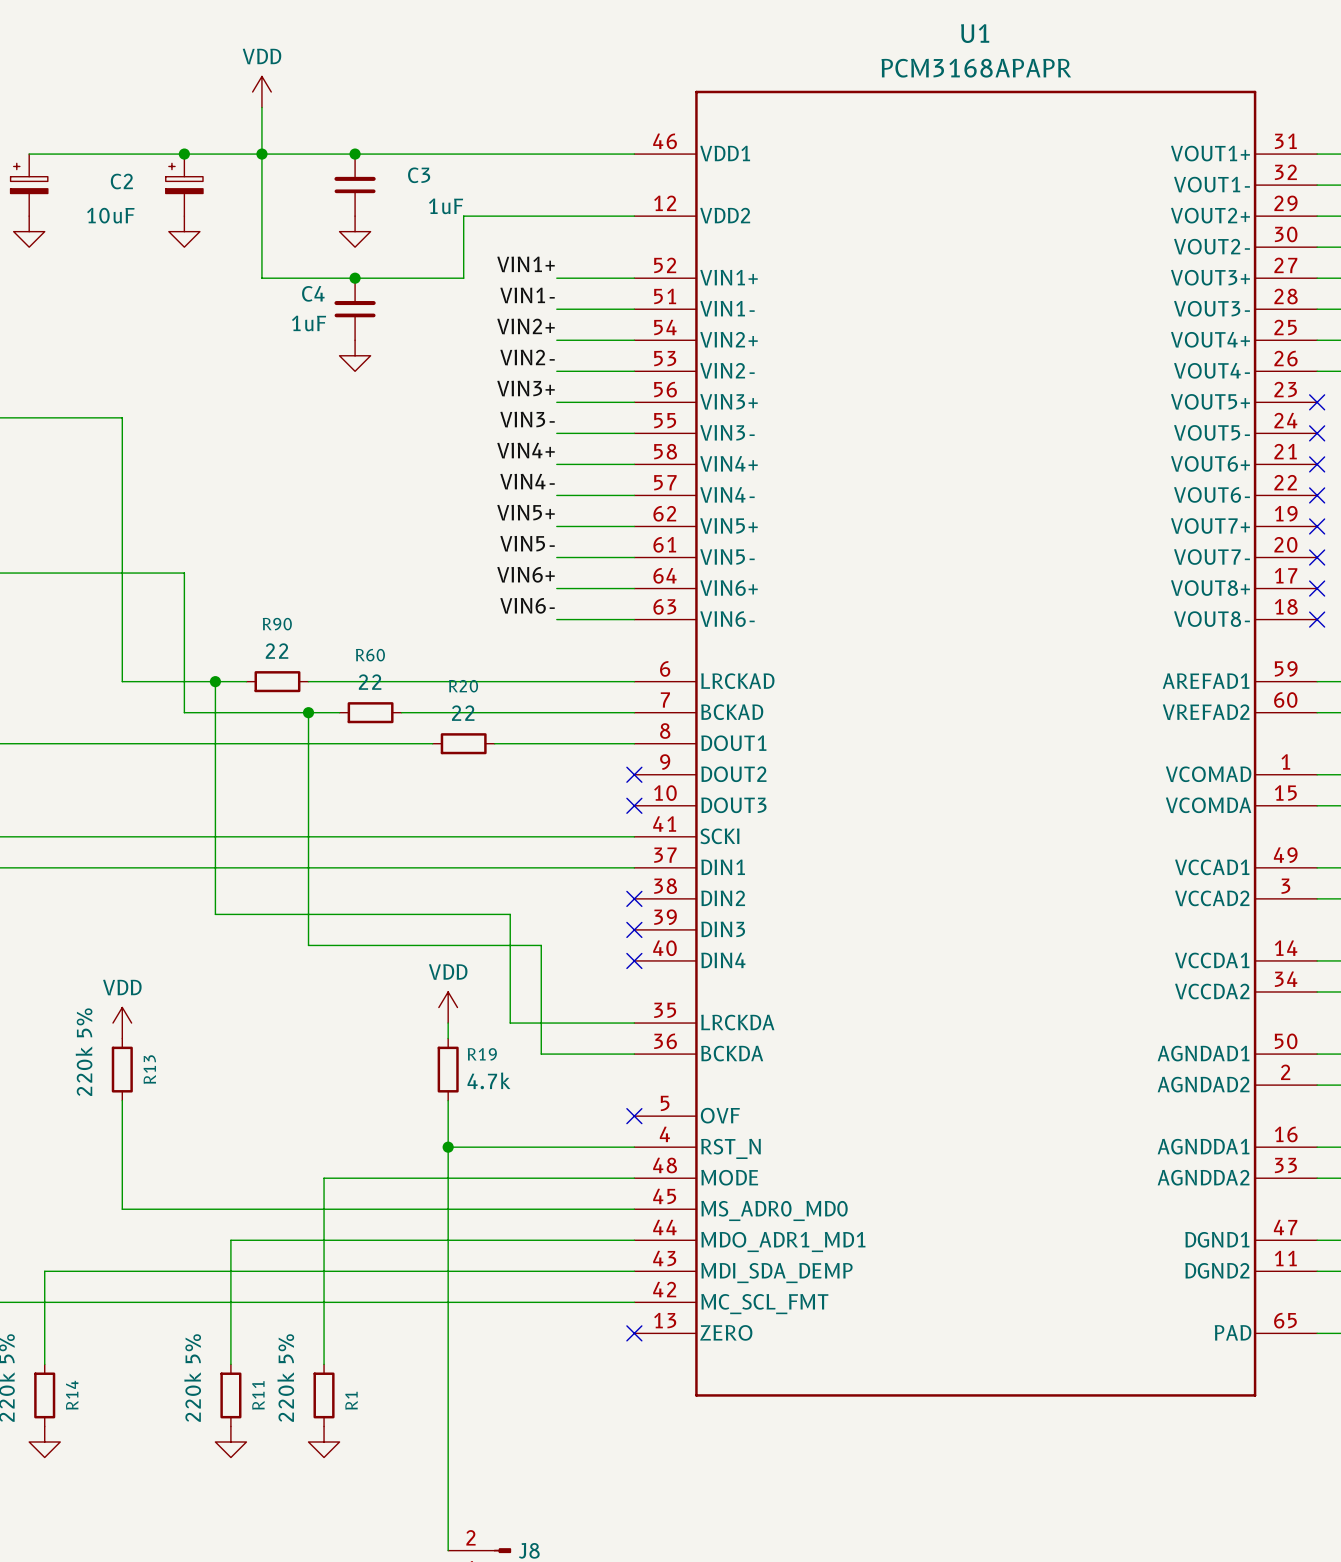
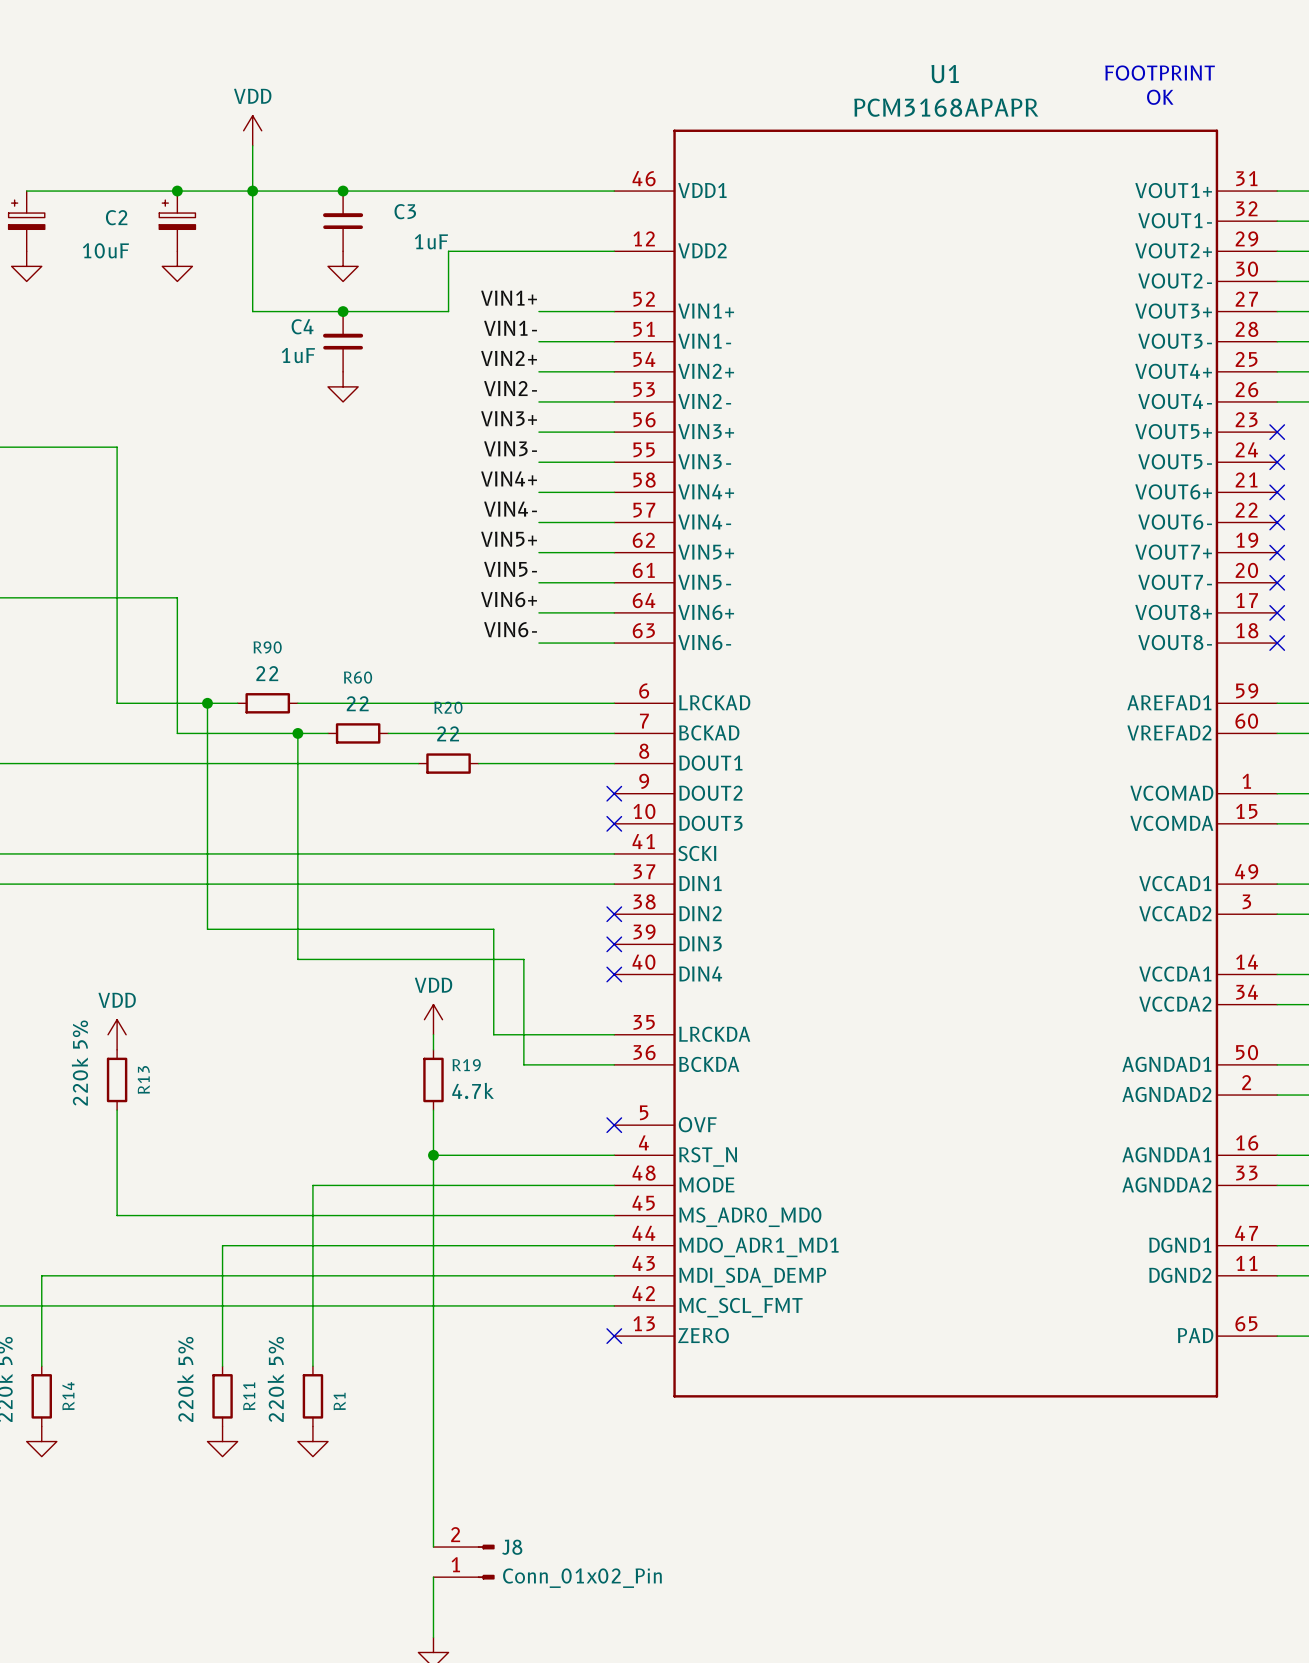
text: none -> FOOTPRINT (1160, 73)
text: none -> OK (1160, 97)

